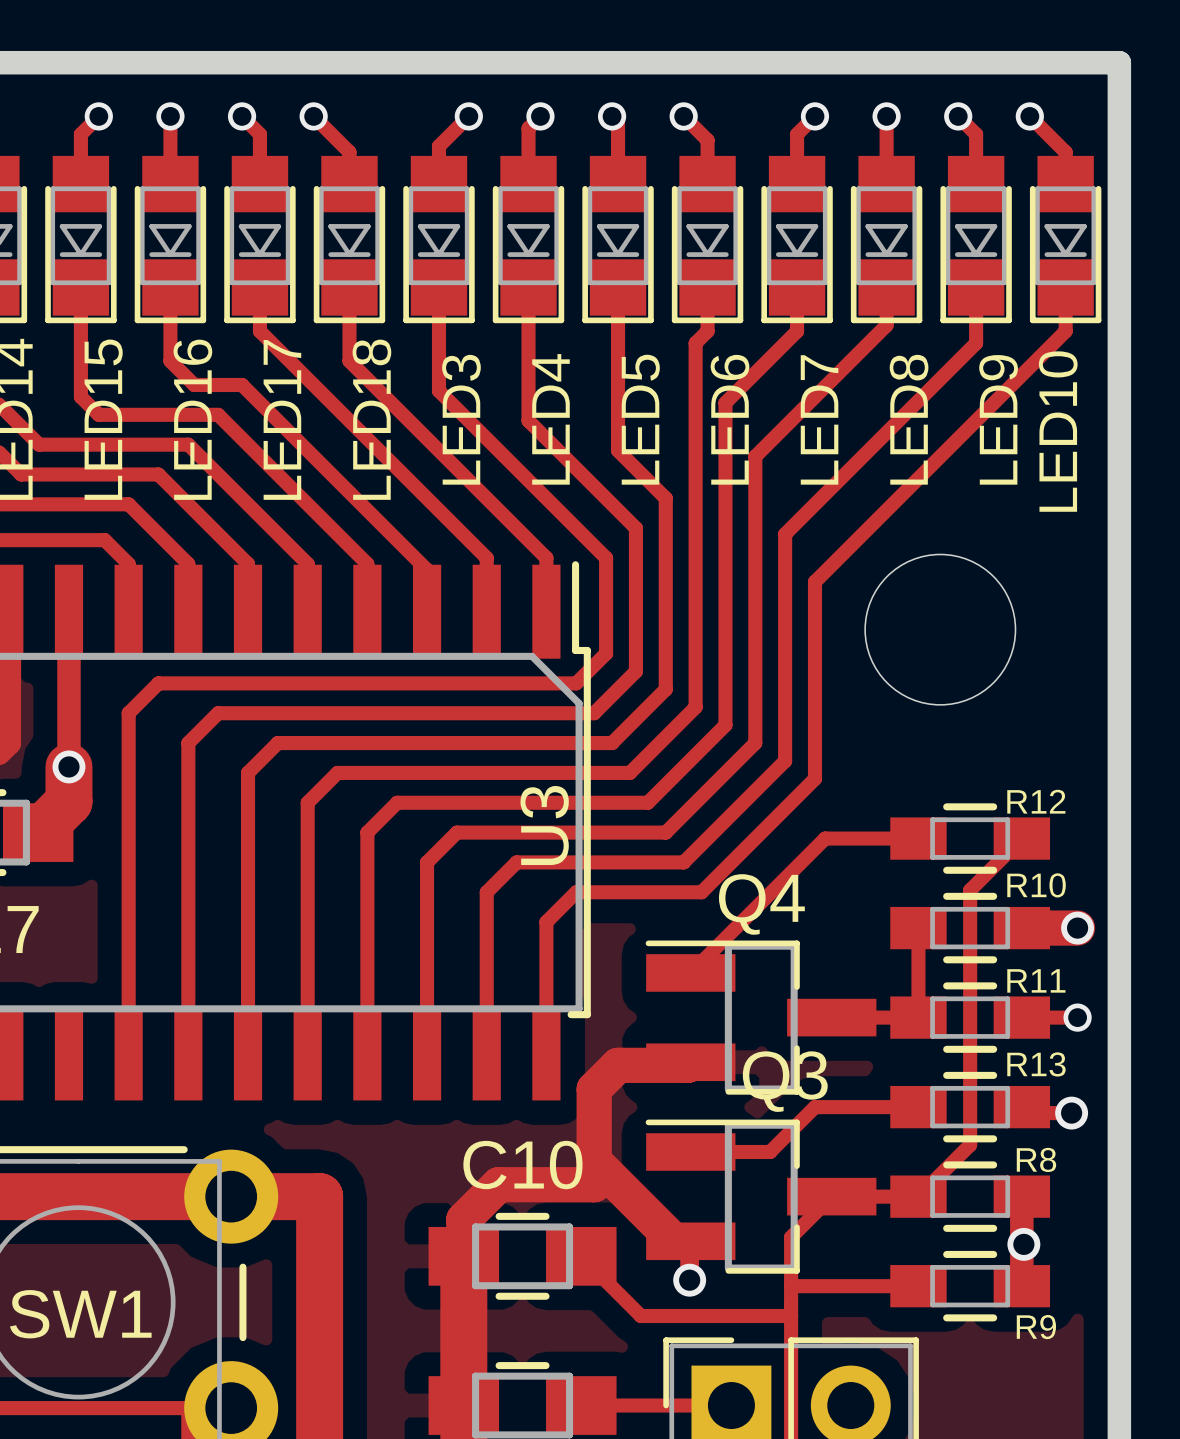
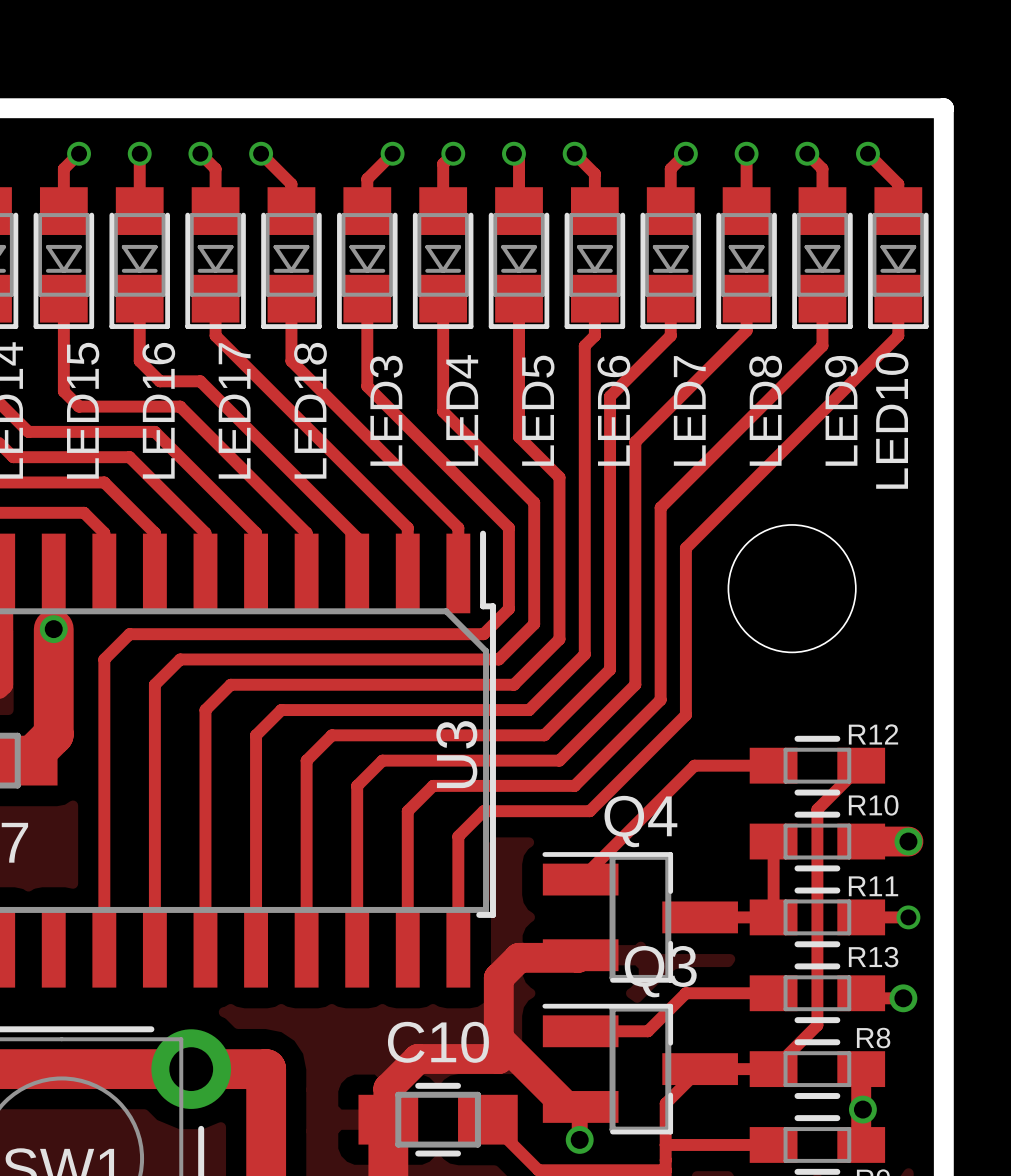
track width: thin (68, 677) (68, 766) -> thick (53, 629) (53, 704)
via: none -> (53, 629)
via: (68, 766) -> none

